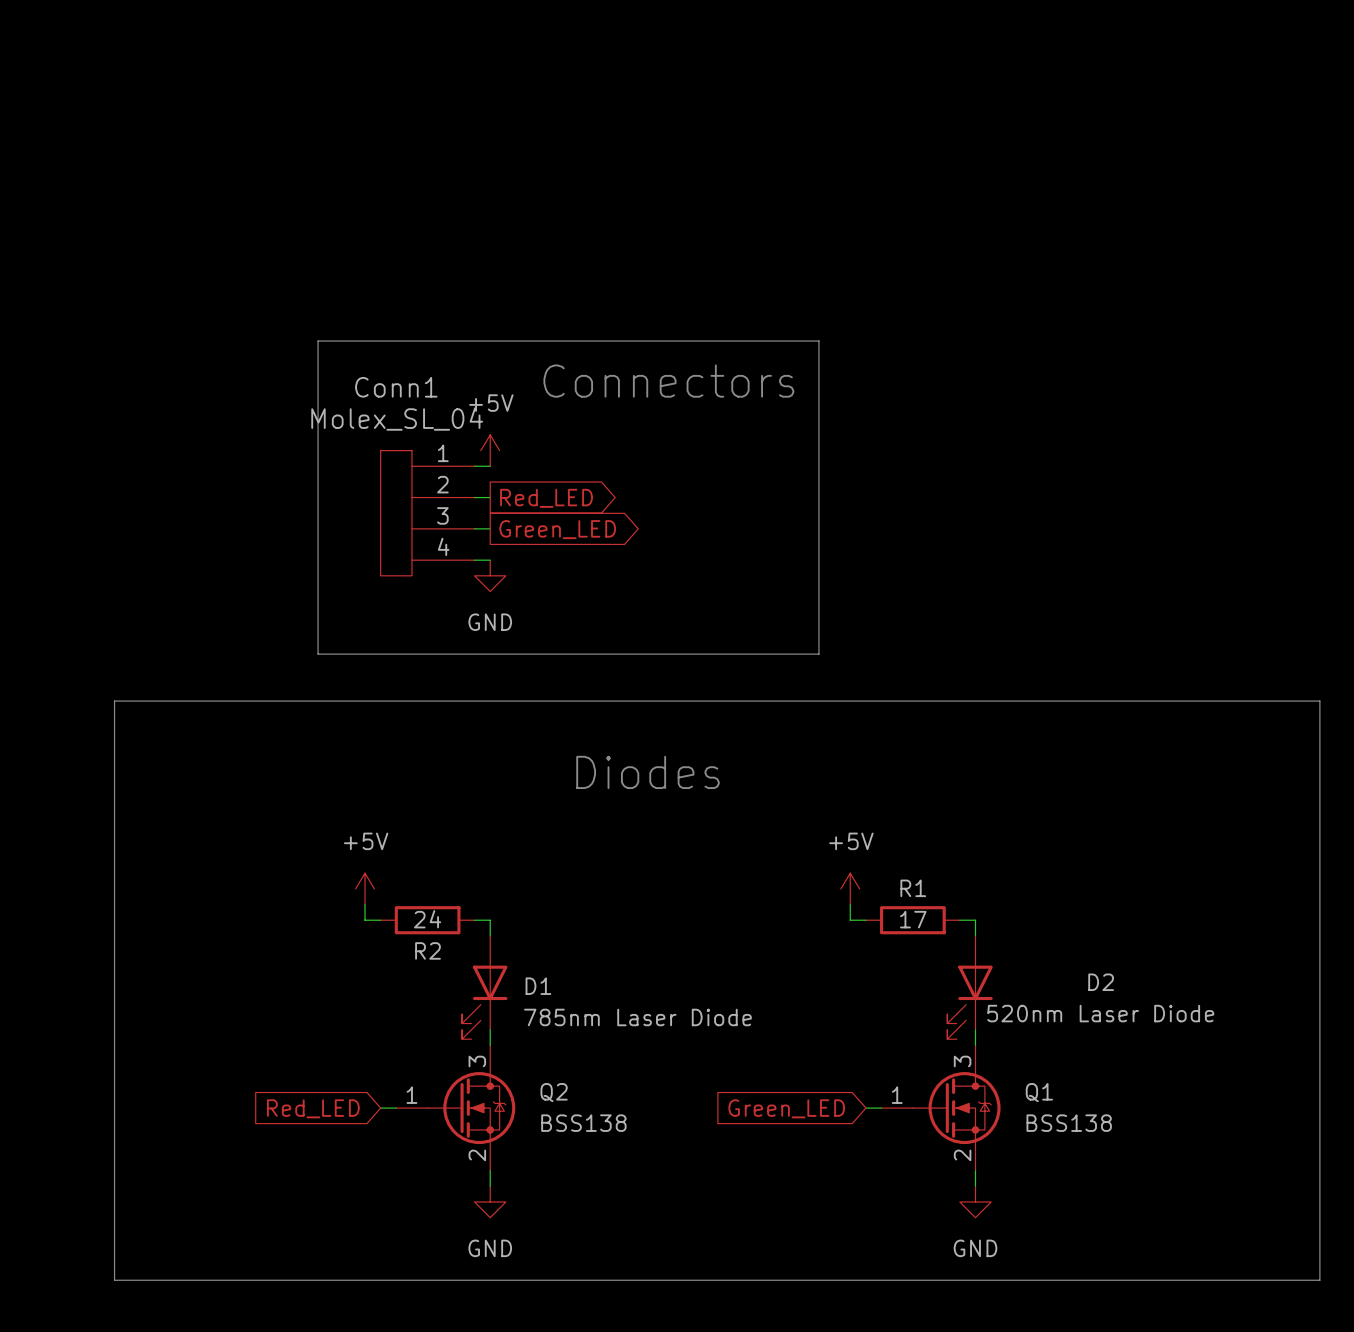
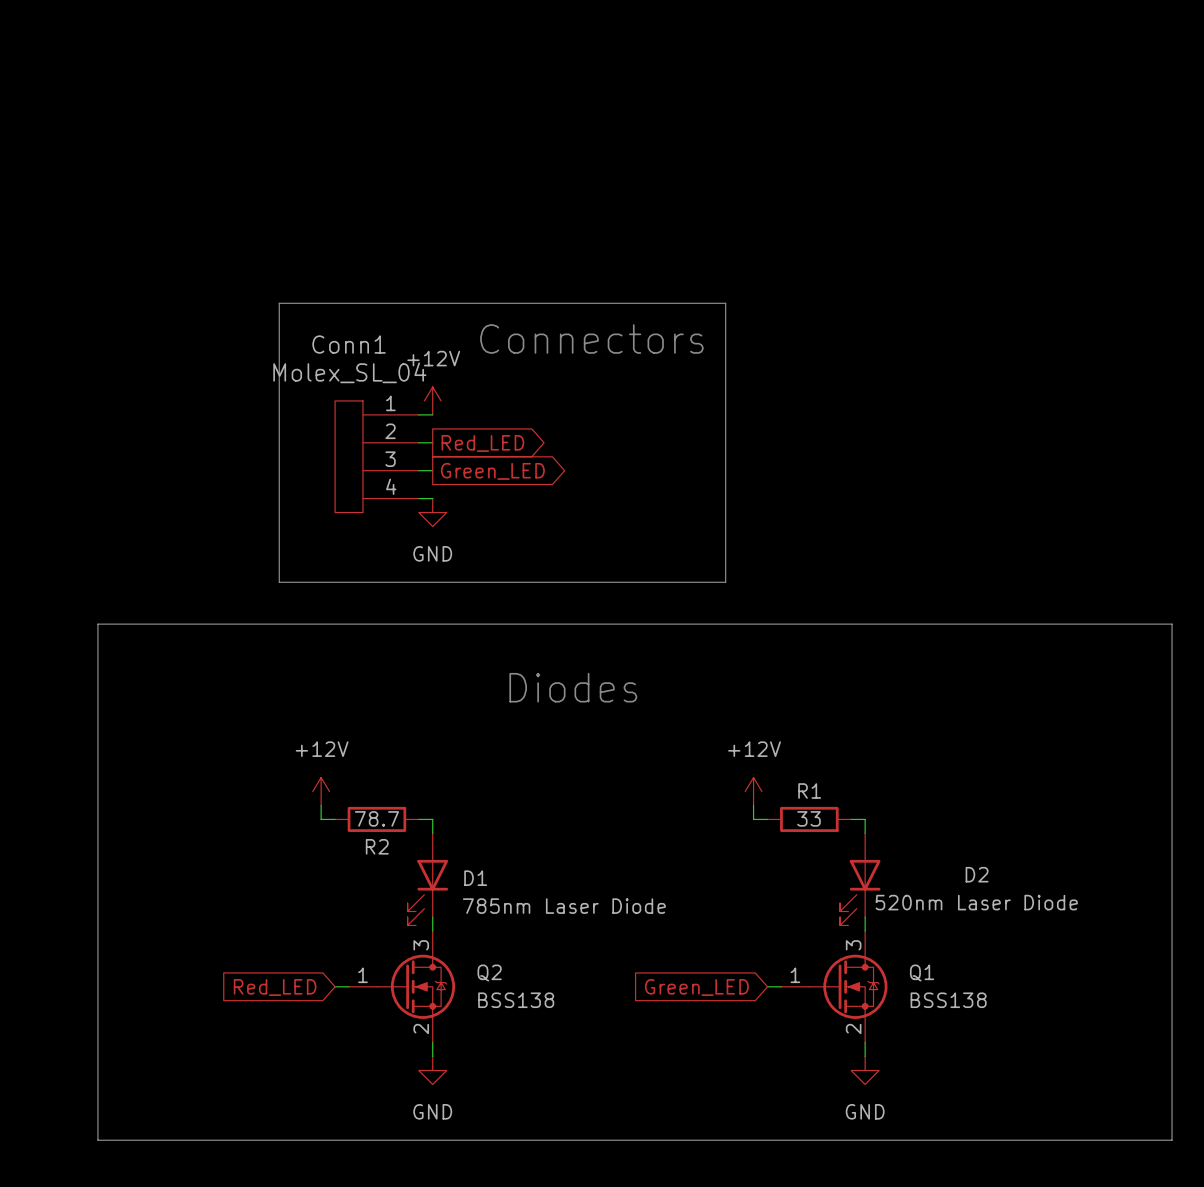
power symbol: +5V (490, 450) -> +12V (432, 400)
power symbol: +5V (365, 888) -> +12V (321, 791)
power symbol: +5V (850, 888) -> +12V (753, 791)
R2 value: 24 (427, 919) -> 78.7 (376, 818)
R1 value: 17 (913, 919) -> 33 (809, 818)

